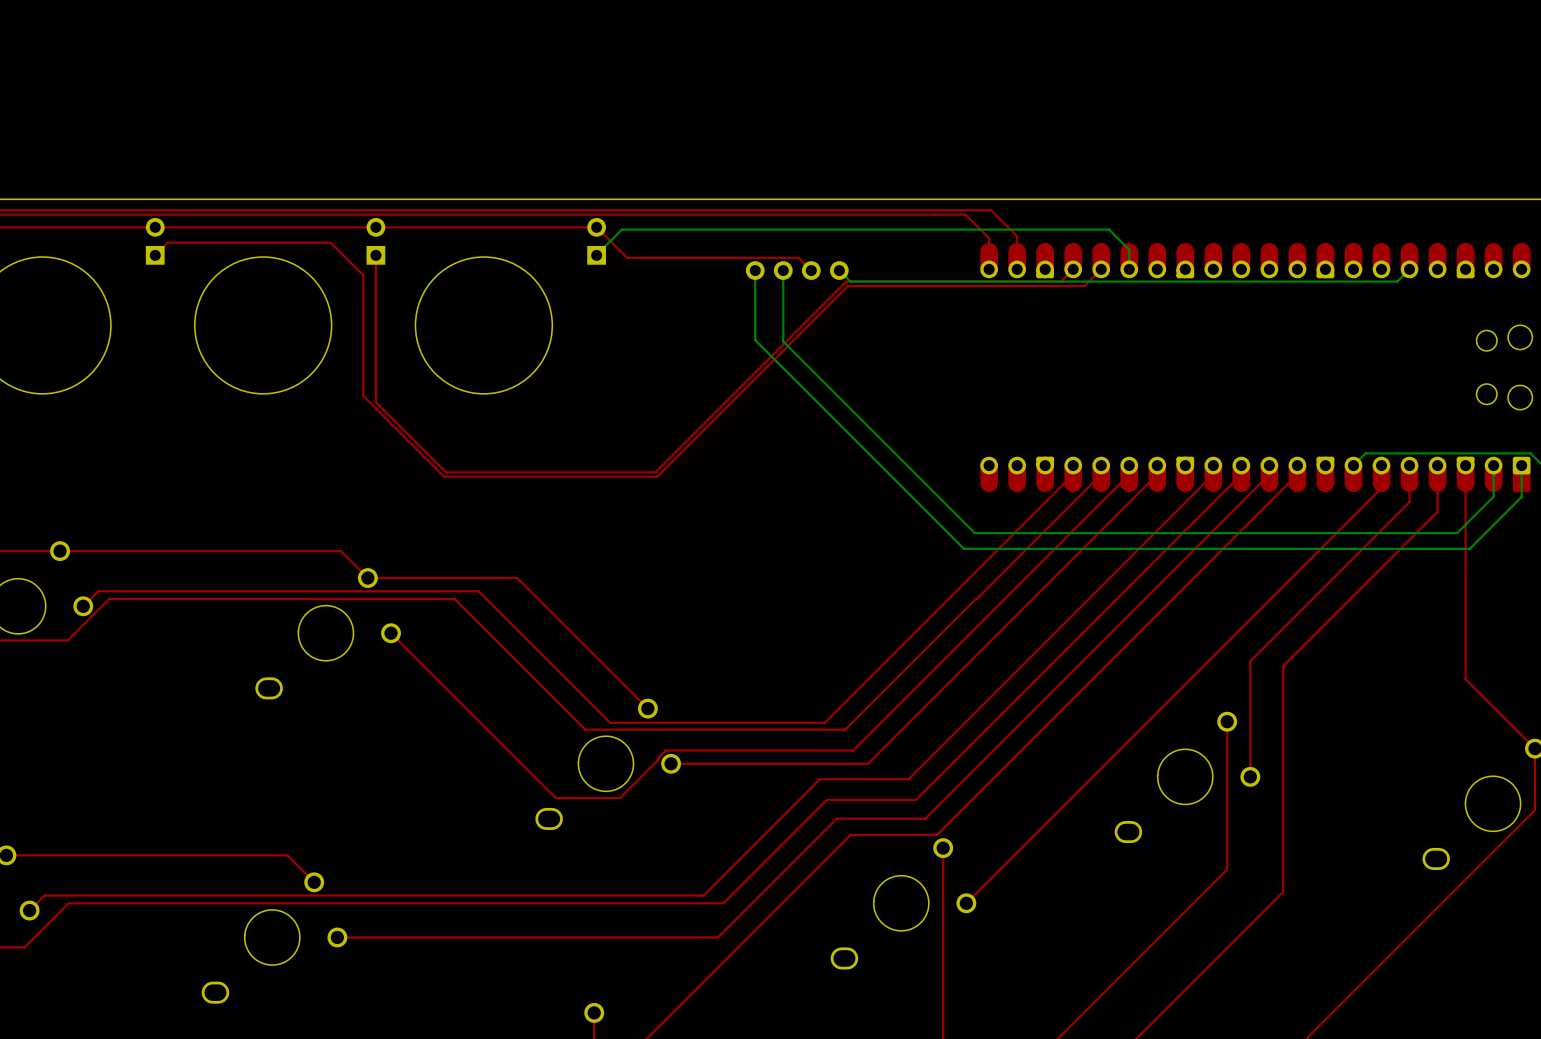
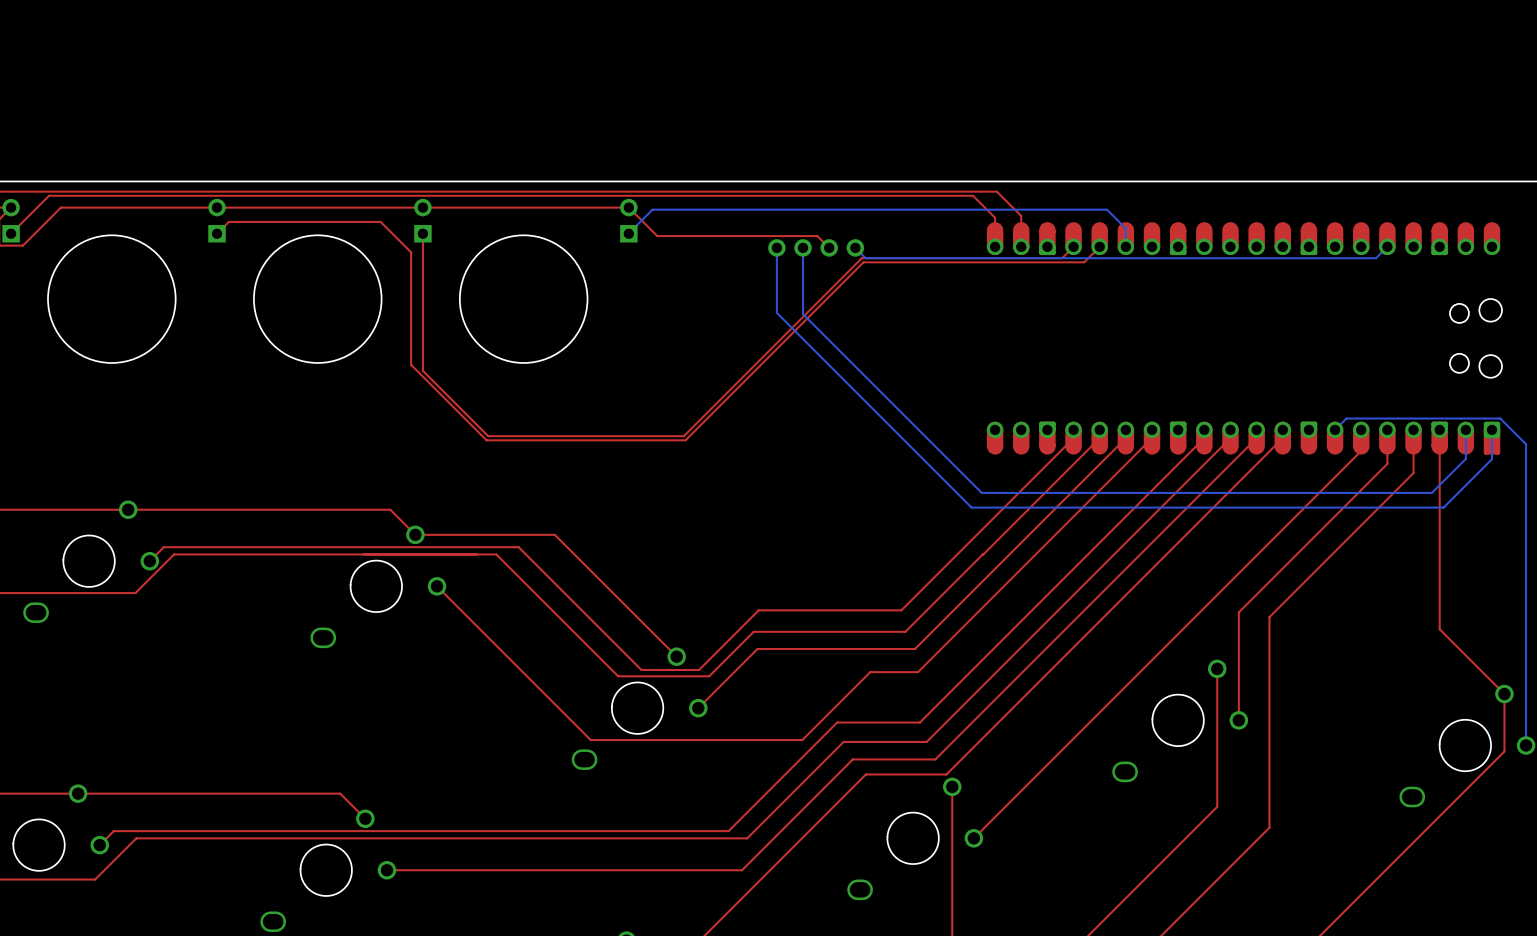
top track: (888, 658) (824, 722) (671, 722) -> (901, 610) (758, 610) (699, 669)
top track: (892, 681) (845, 729) (682, 729) -> (905, 631) (753, 631) (709, 676)
top track: (903, 700) (853, 750) (665, 750) (620, 797) -> (918, 672) (870, 672) (802, 740) (650, 740)
top track: (906, 725) (867, 763) (671, 763) -> (915, 649) (757, 649) (698, 708)

